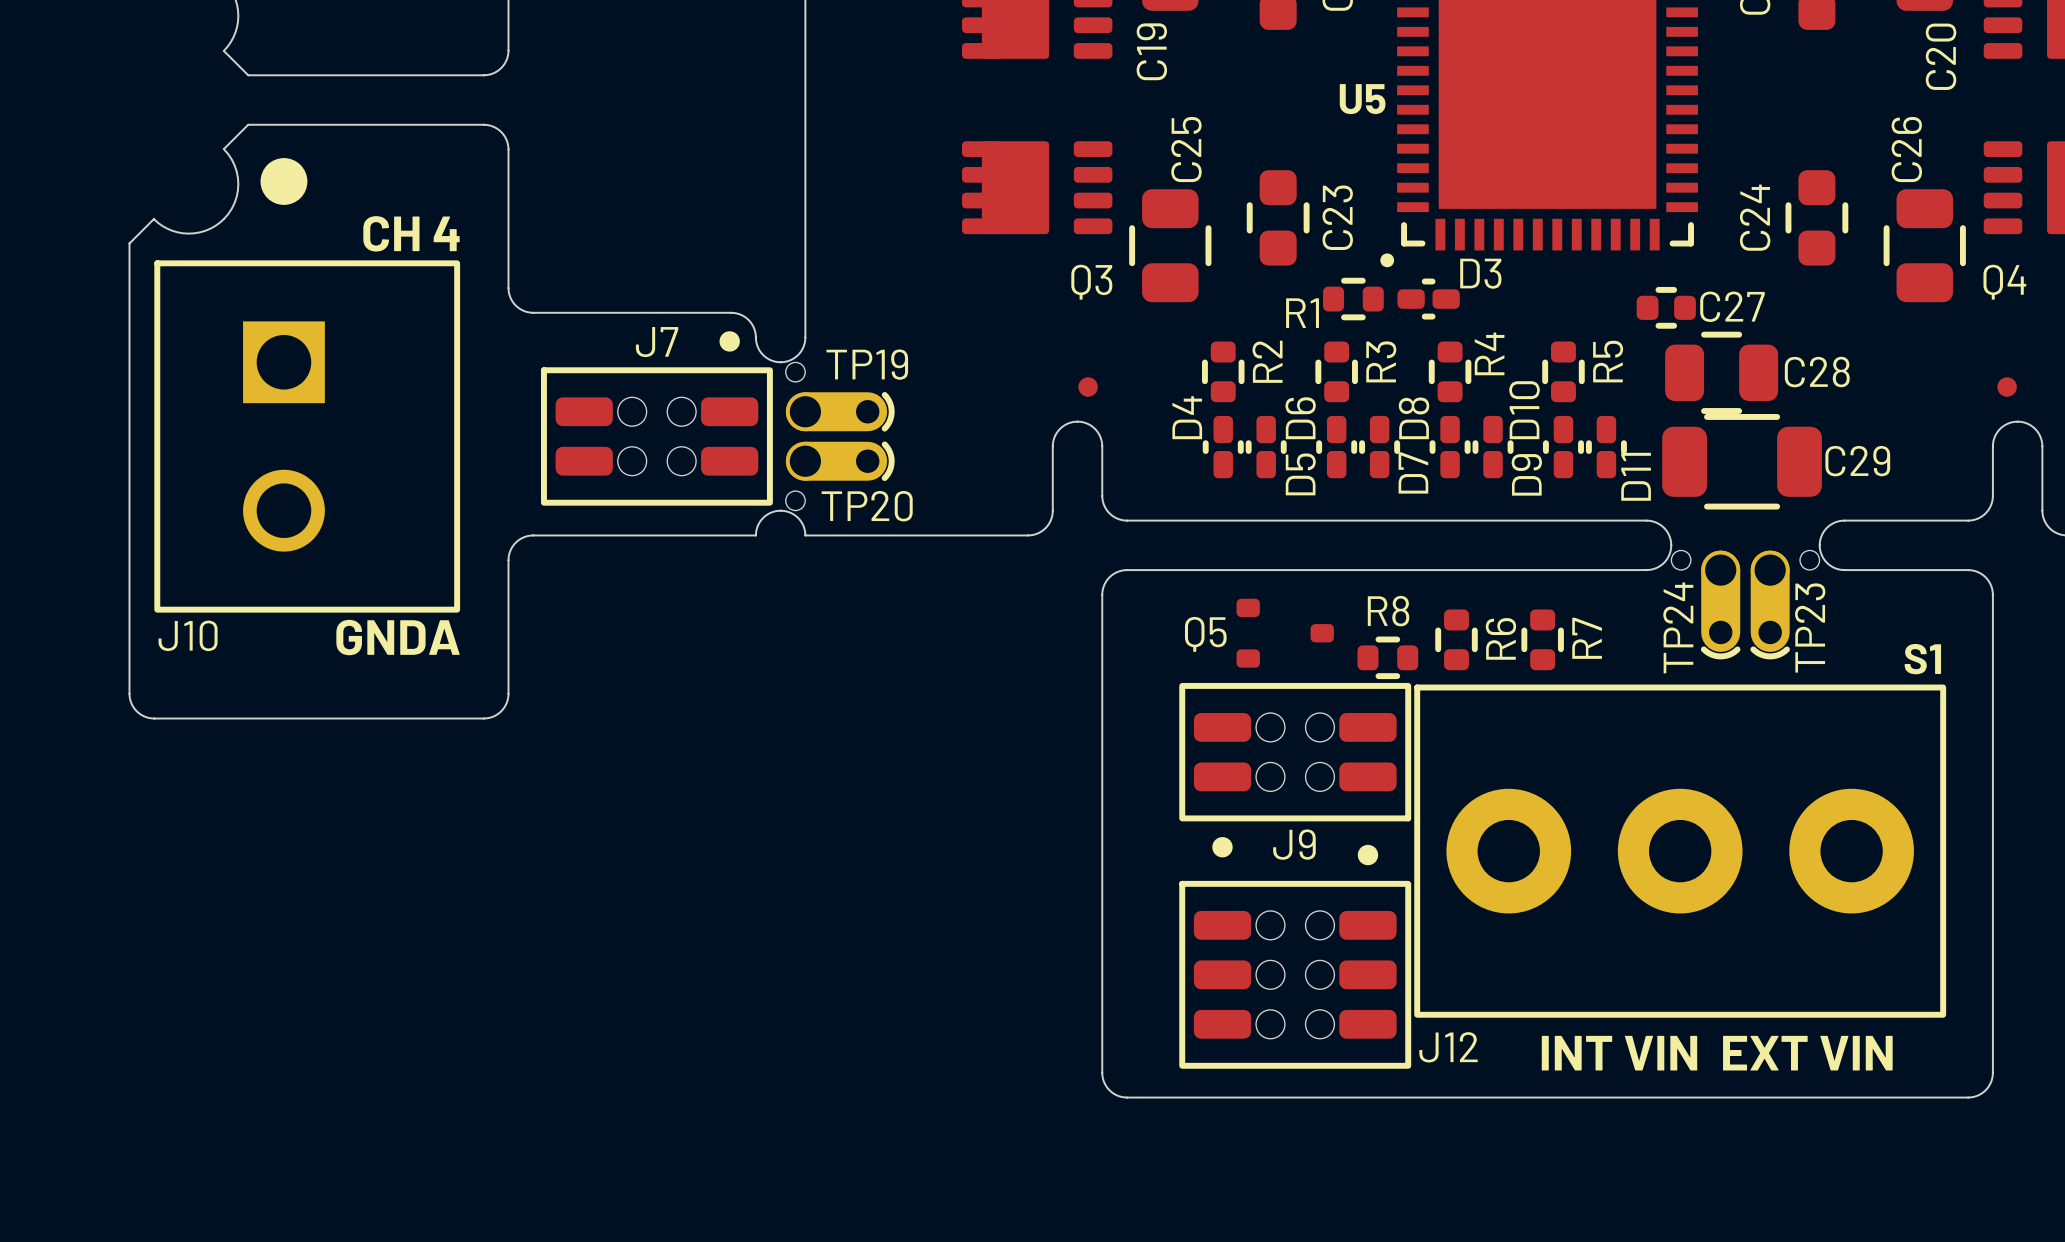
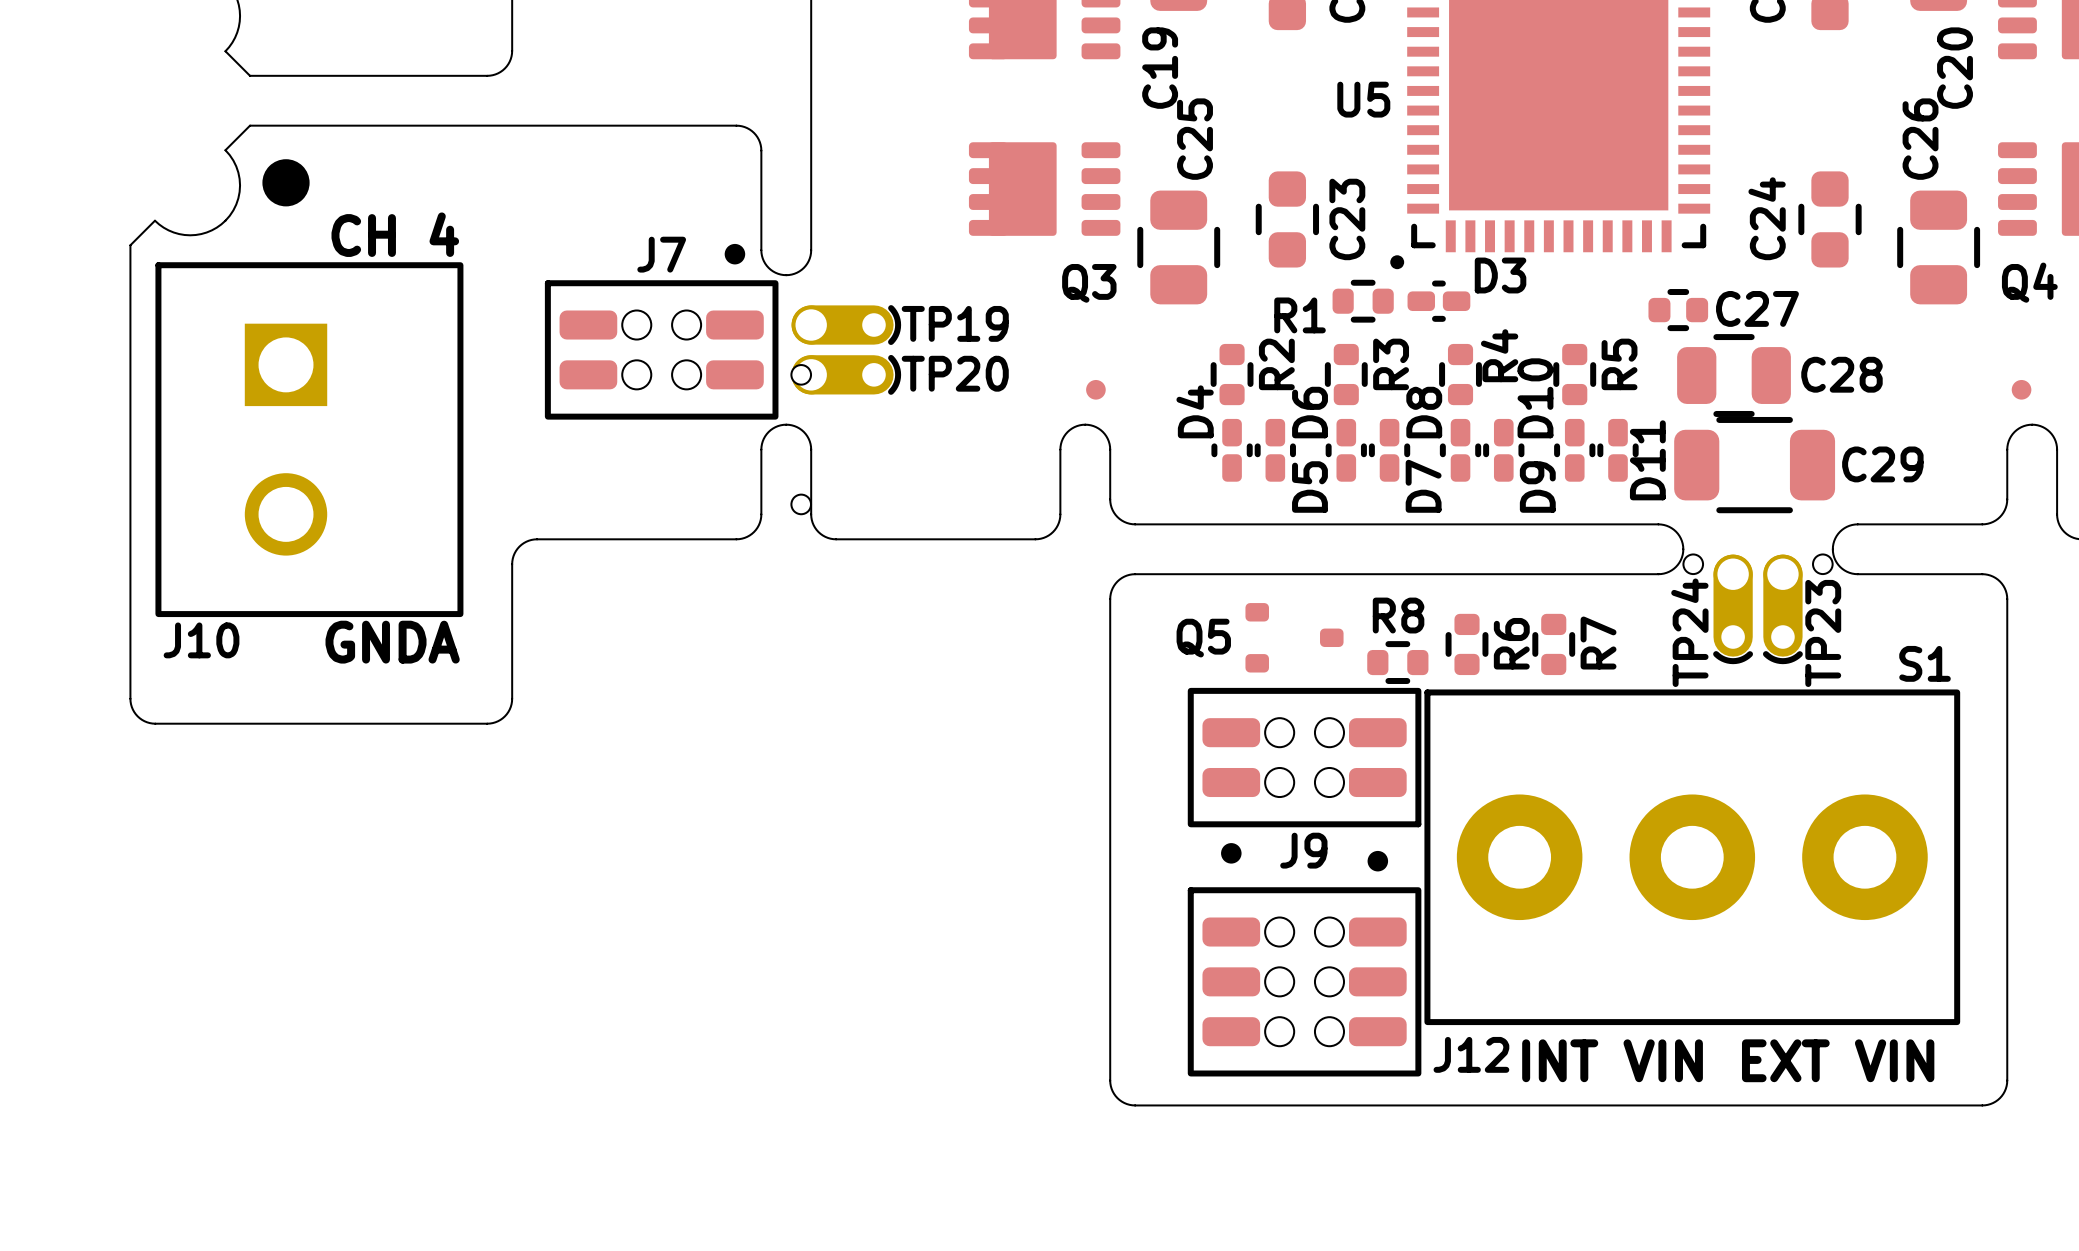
board edge: (483, 124) (499, 130) (507, 144) (508, 290) (513, 303) (525, 311) (736, 313) (744, 316) (752, 324) (757, 345) (763, 355) (772, 360) (786, 361) (798, 355) (804, 343) (805, 248) -> (487, 125) (744, 127) (755, 135) (761, 147) (761, 250) (763, 261) (775, 272) (791, 274) (805, 265) (811, 250)
TP19 name position: TP19 (867, 364) -> TP19 (955, 323)
TP19 position: (840, 411) -> (846, 325)
J7 position: (656, 418) -> (661, 331)
TP20 position: (840, 461) -> (846, 374)
TP20 name position: TP20 (867, 506) -> TP20 (955, 373)
board edge: (731, 535) (755, 535) (757, 527) (763, 517) (772, 512) (780, 510) (788, 512) (798, 517) (802, 524) (805, 535) (830, 535) -> (736, 539) (751, 533) (760, 519) (761, 449) (763, 438) (773, 428) (786, 424) (801, 430) (810, 444) (811, 514) (813, 525) (822, 535) (836, 539)

